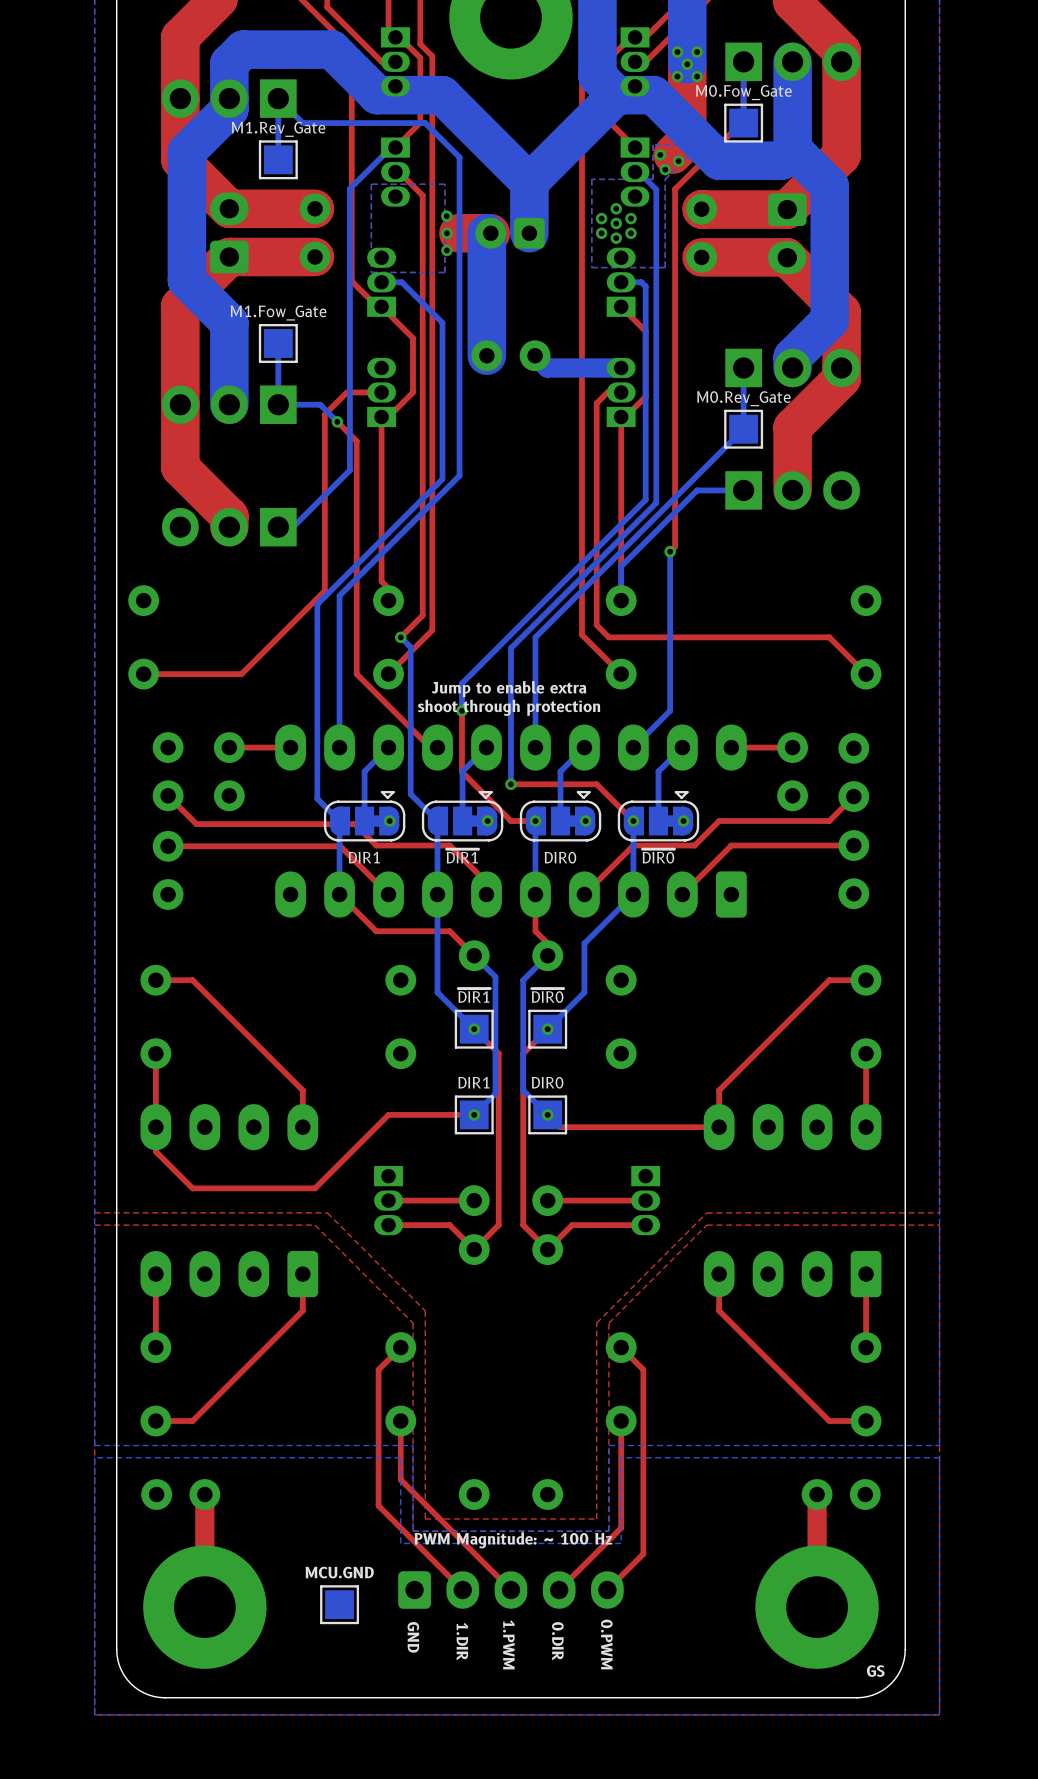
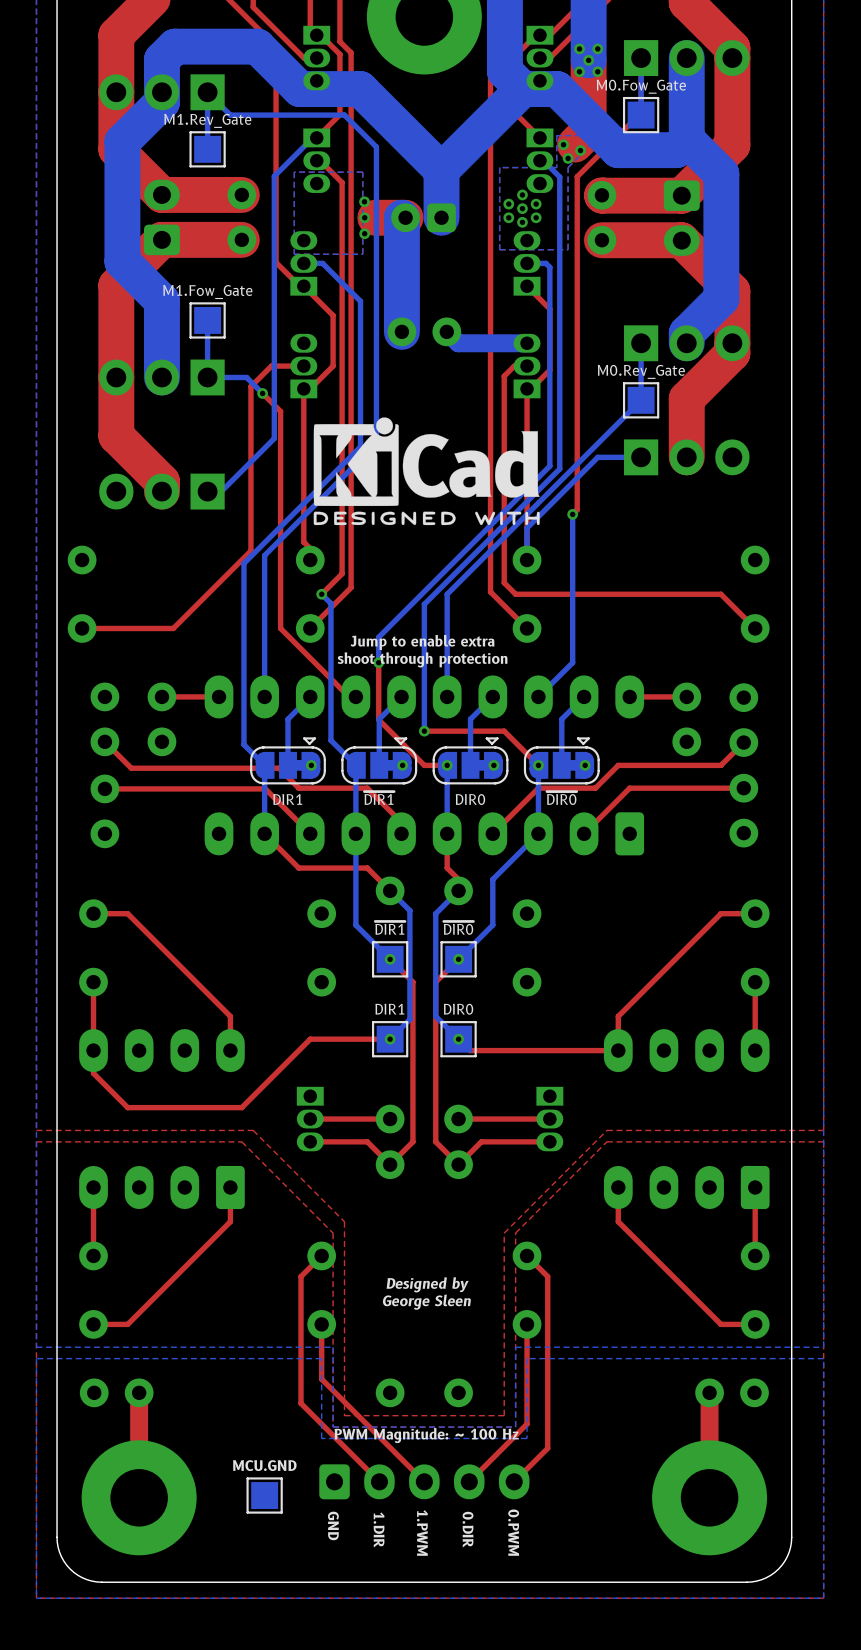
drawing: none -> [313, 417, 540, 526]
text: none -> Designed by (427, 1284)
text: none -> George Sleen (426, 1302)
text: GS (875, 1671) -> none

